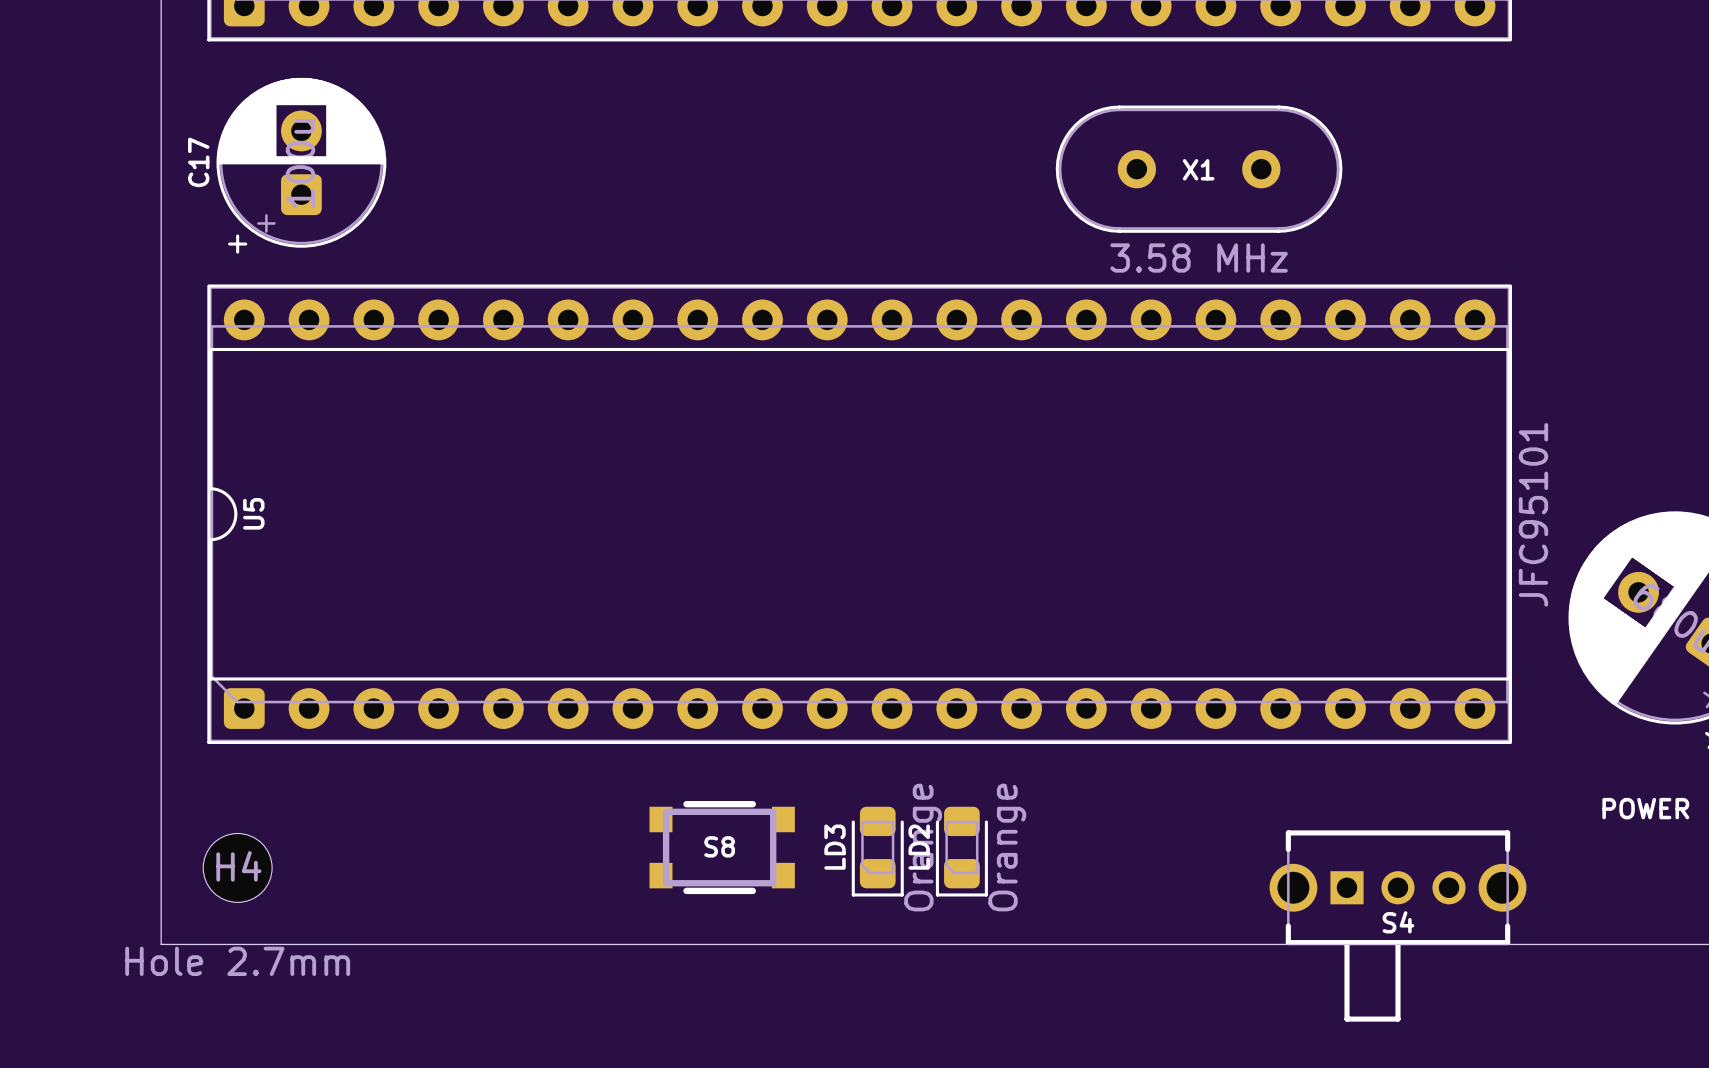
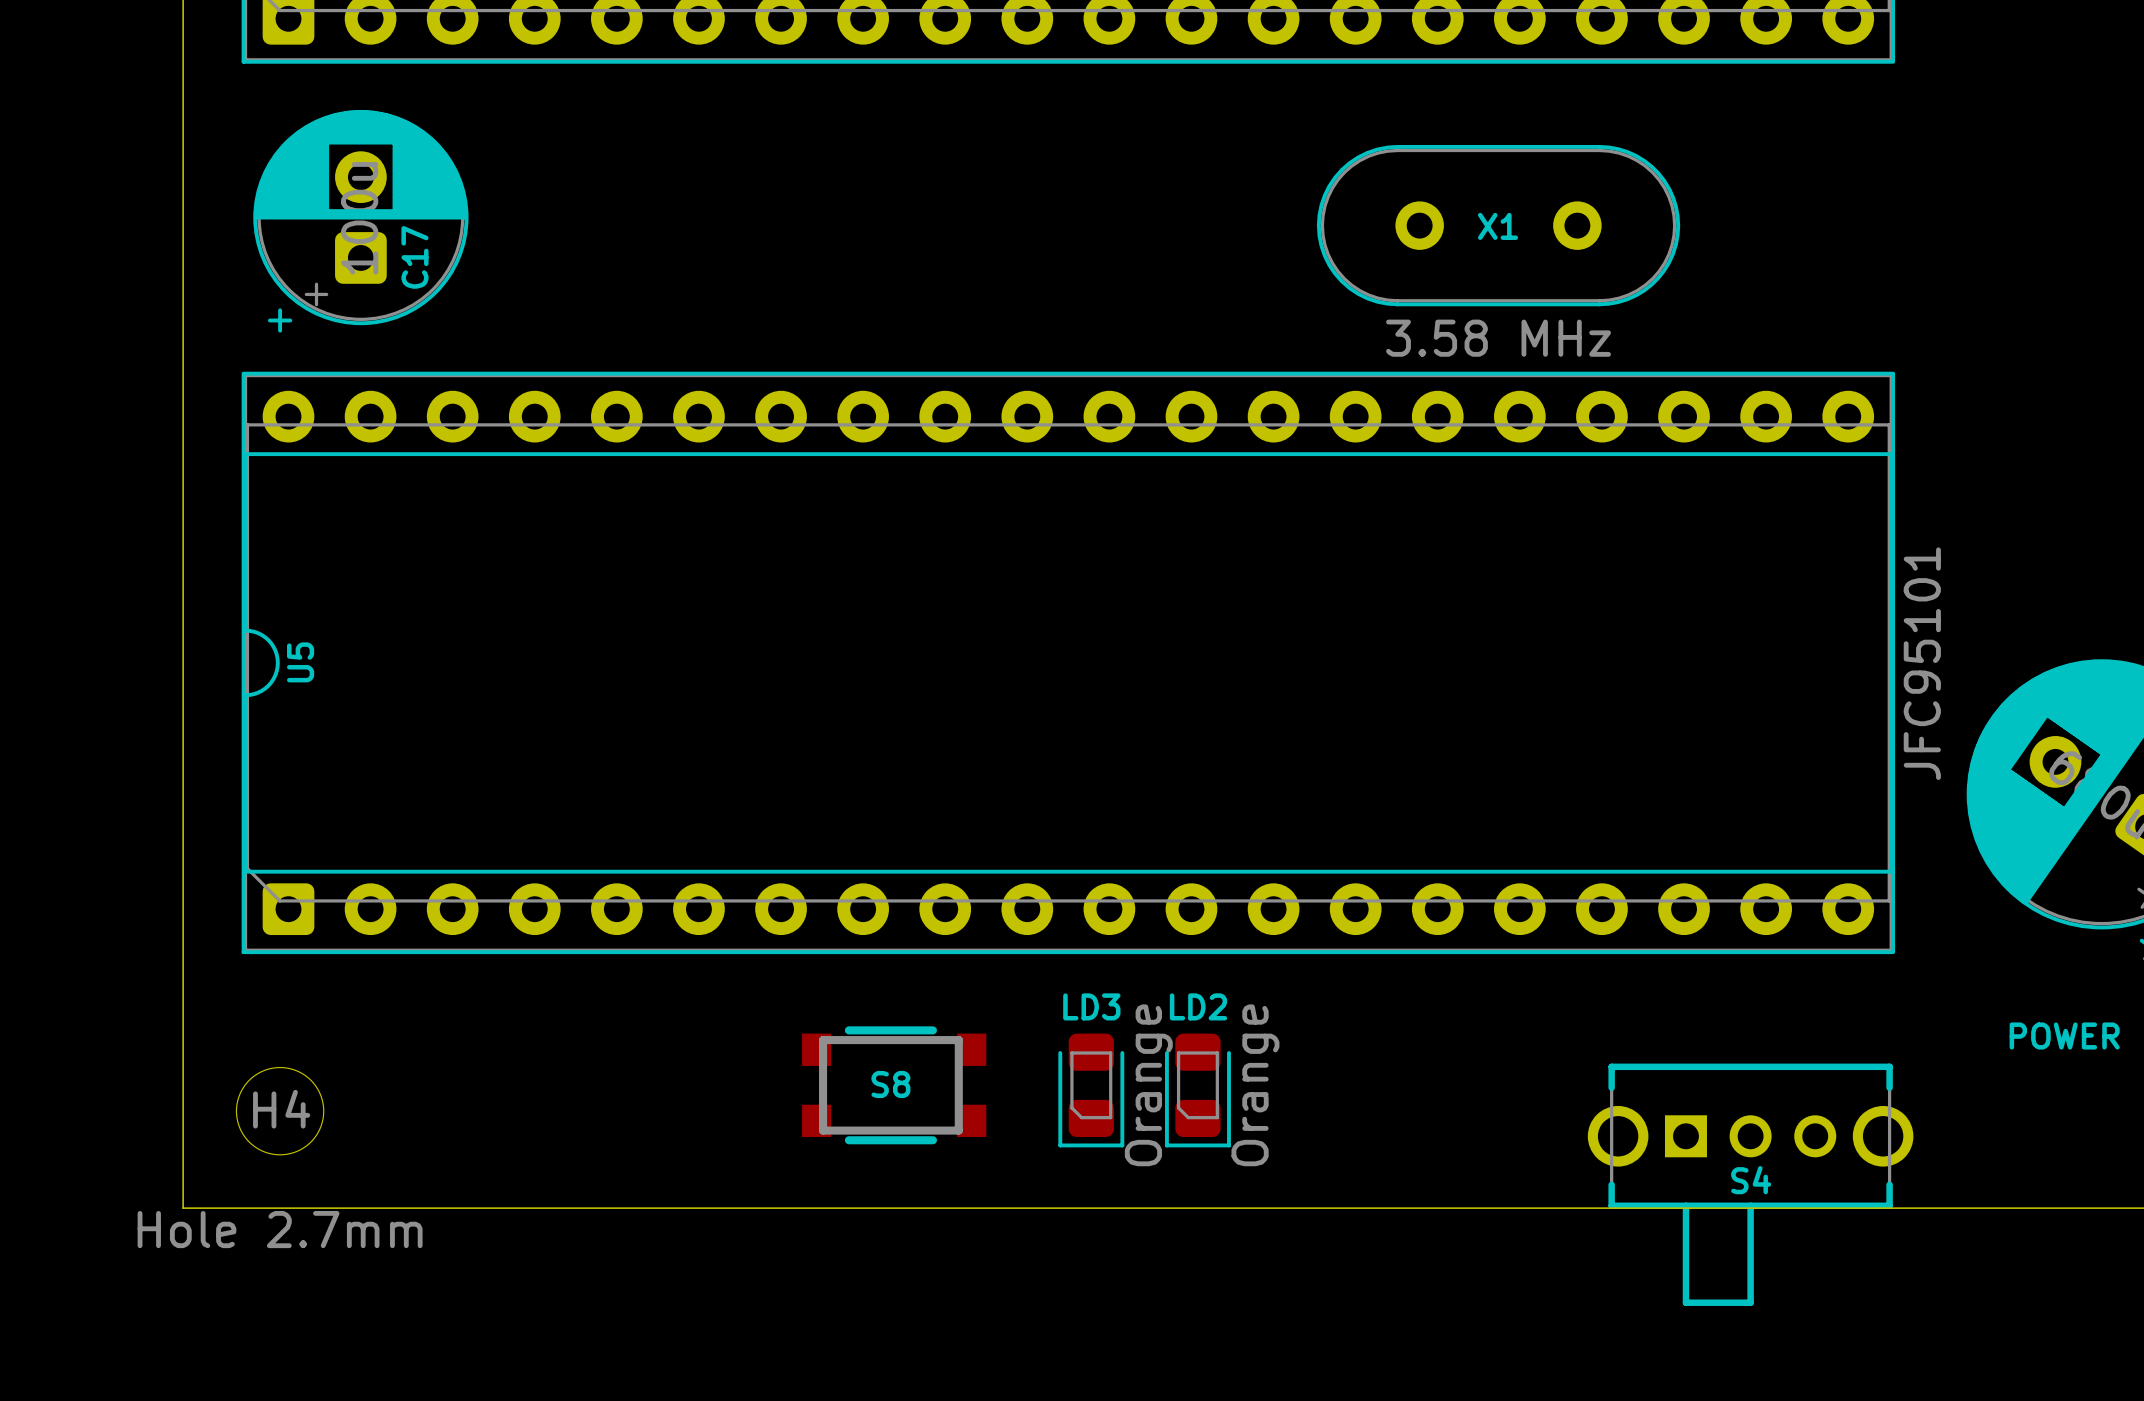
C17 name position: C17 (198, 162) -> C17 (414, 257)
LD3 name rotation: 0° (835, 847) -> 90° clockwise (1091, 1006)
LD3 name position: LD3 (835, 847) -> LD3 (1091, 1006)
LD2 name rotation: 0° (919, 847) -> 90° clockwise (1198, 1006)
LD2 name position: LD2 (919, 847) -> LD2 (1198, 1006)

